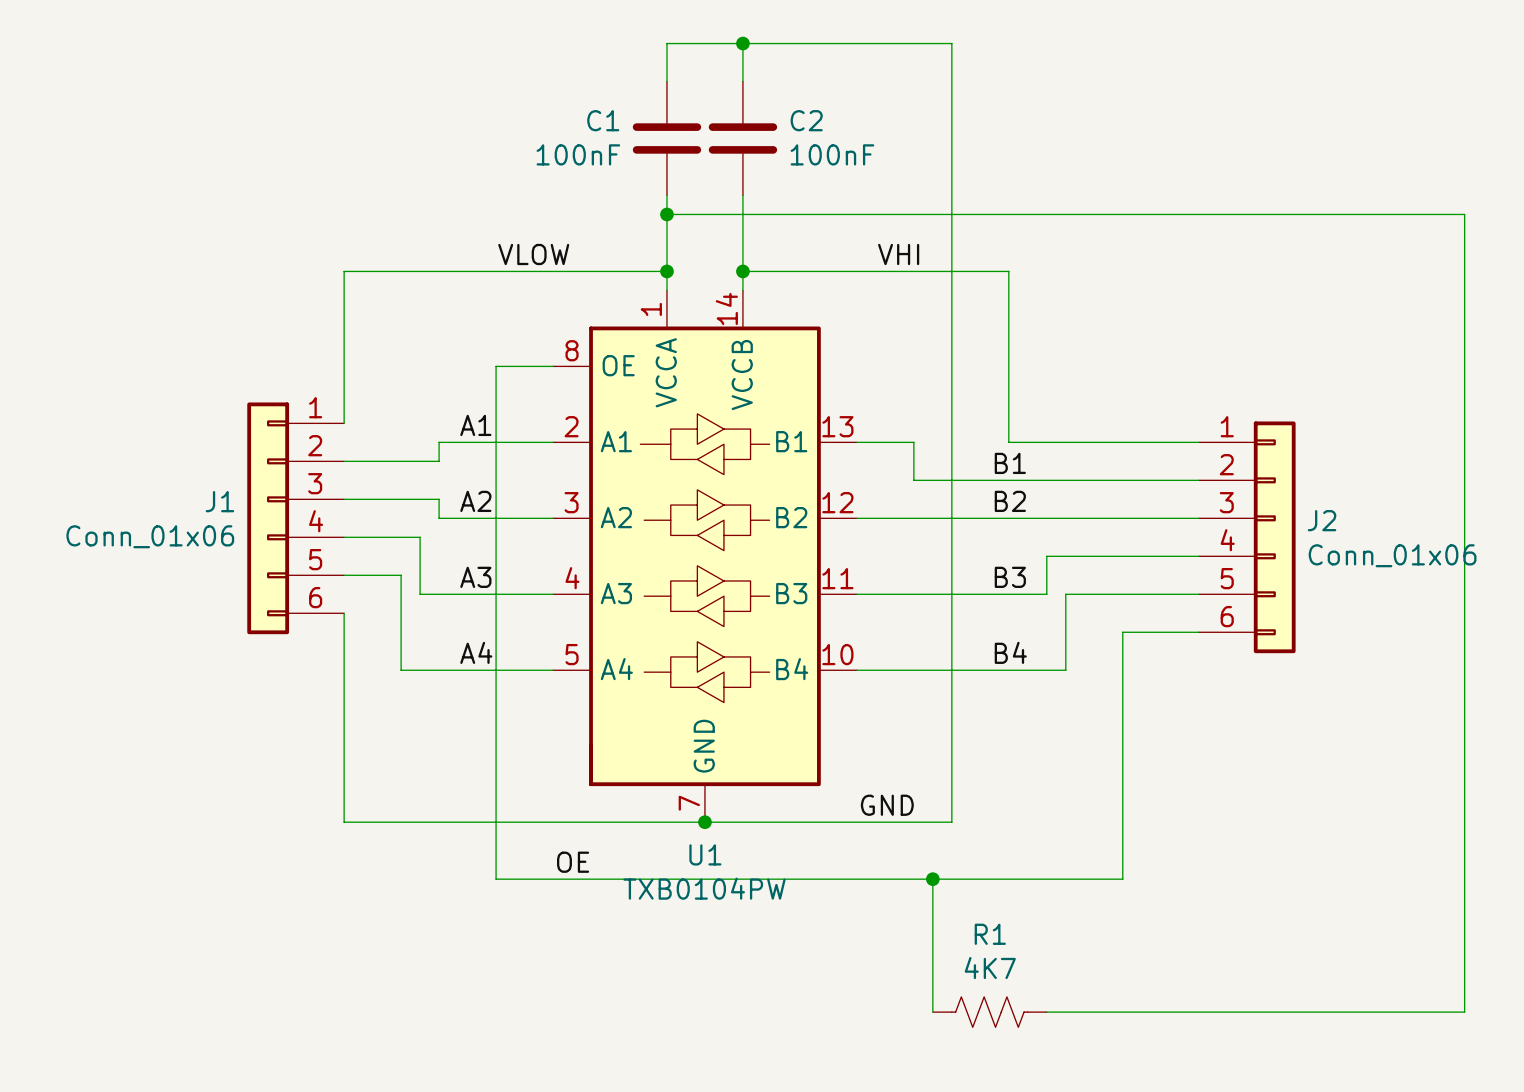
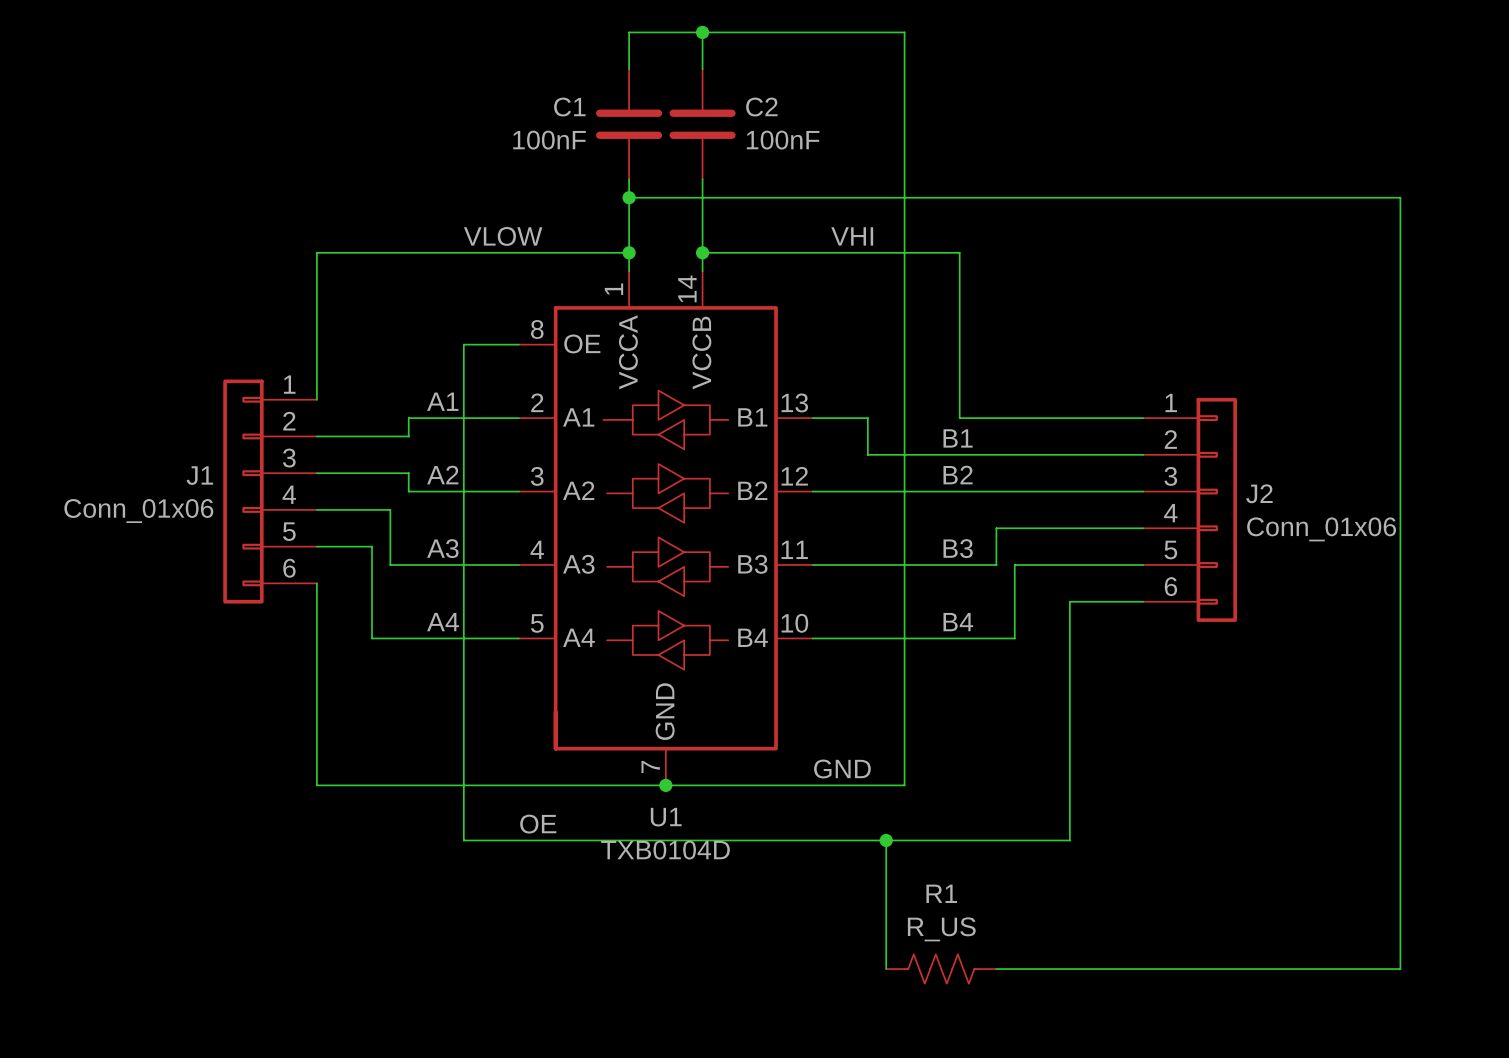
U1 value: TXB0104PW (704, 888) -> TXB0104D (665, 850)
R1 value: 4K7 (990, 968) -> R_US (941, 929)

